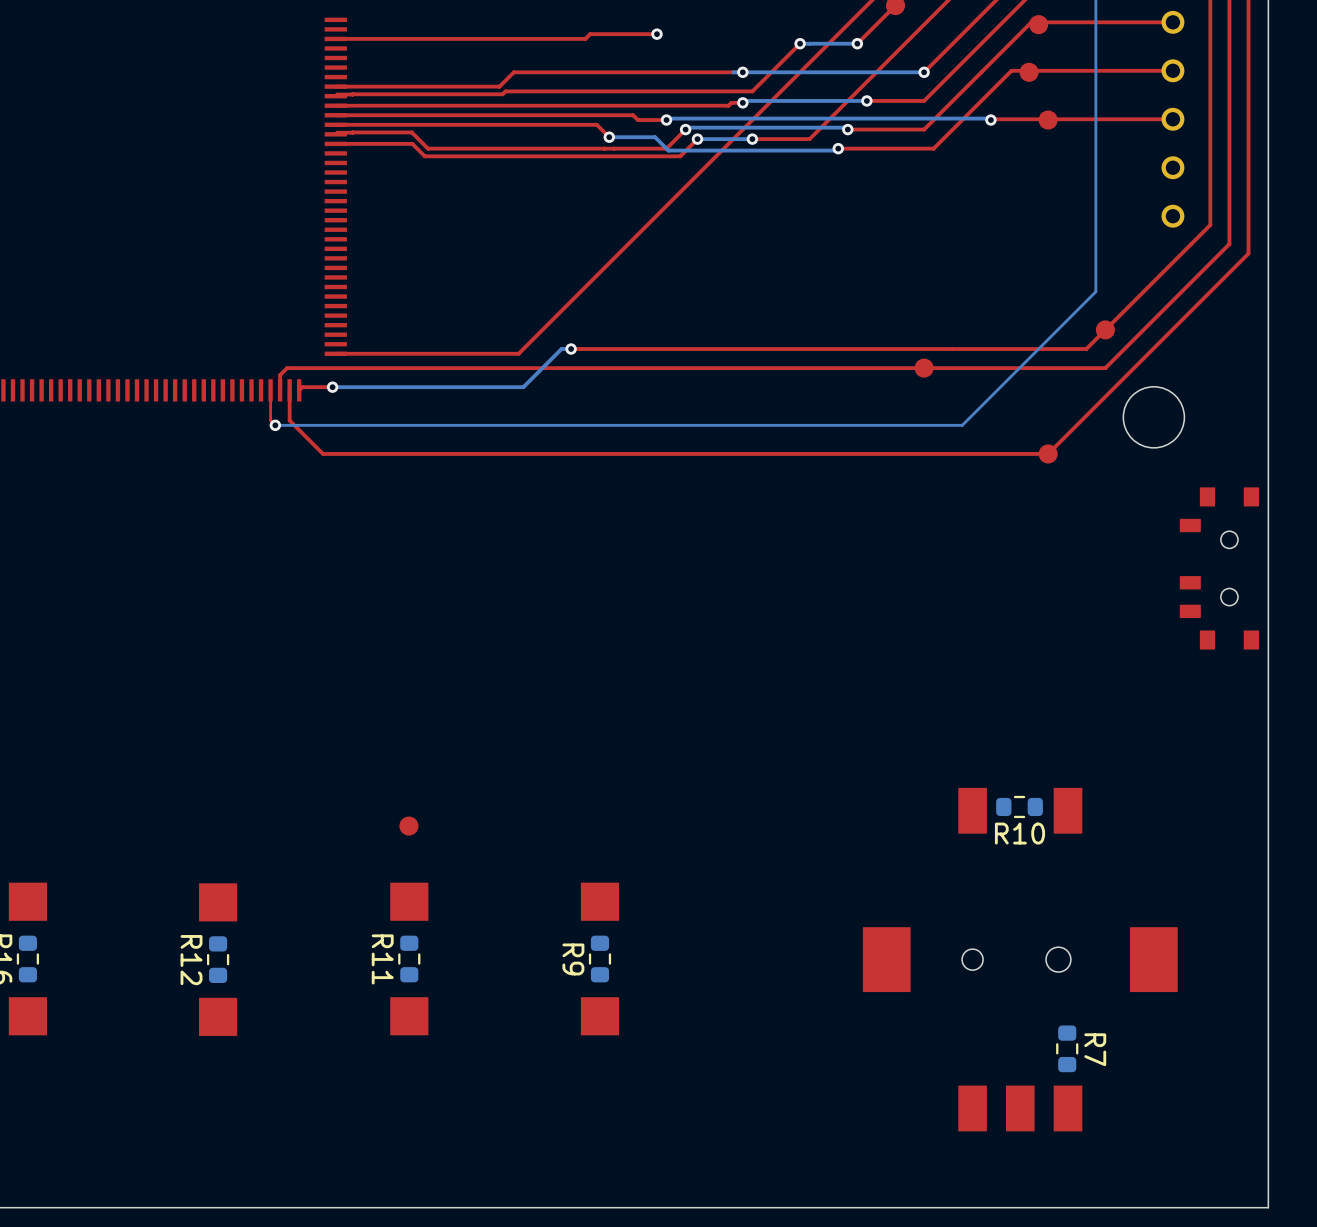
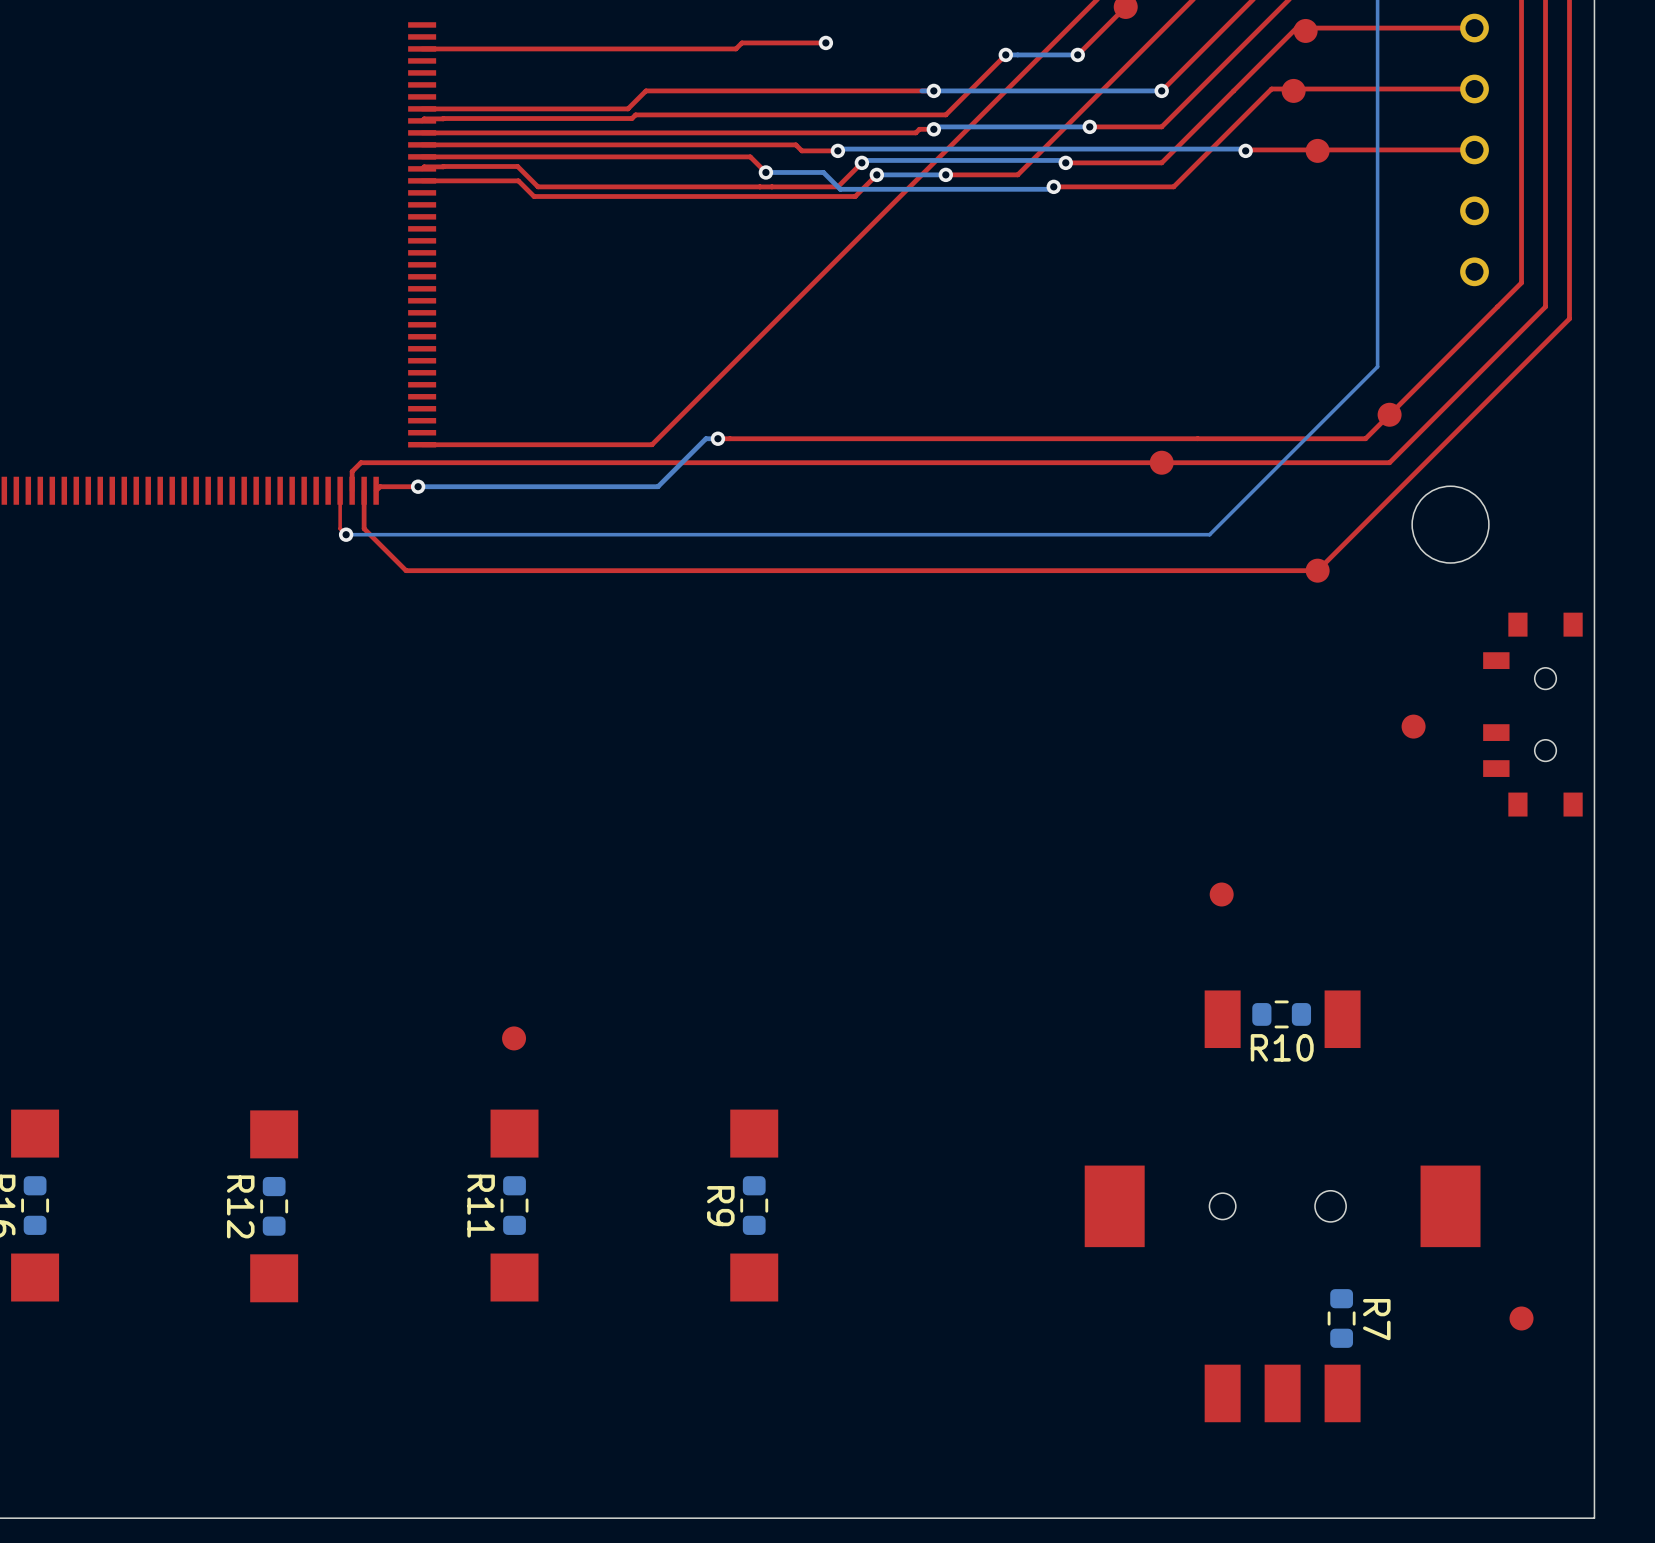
part: none -> (1413, 726)
part: none -> (1221, 894)
part: none -> (1521, 1318)

